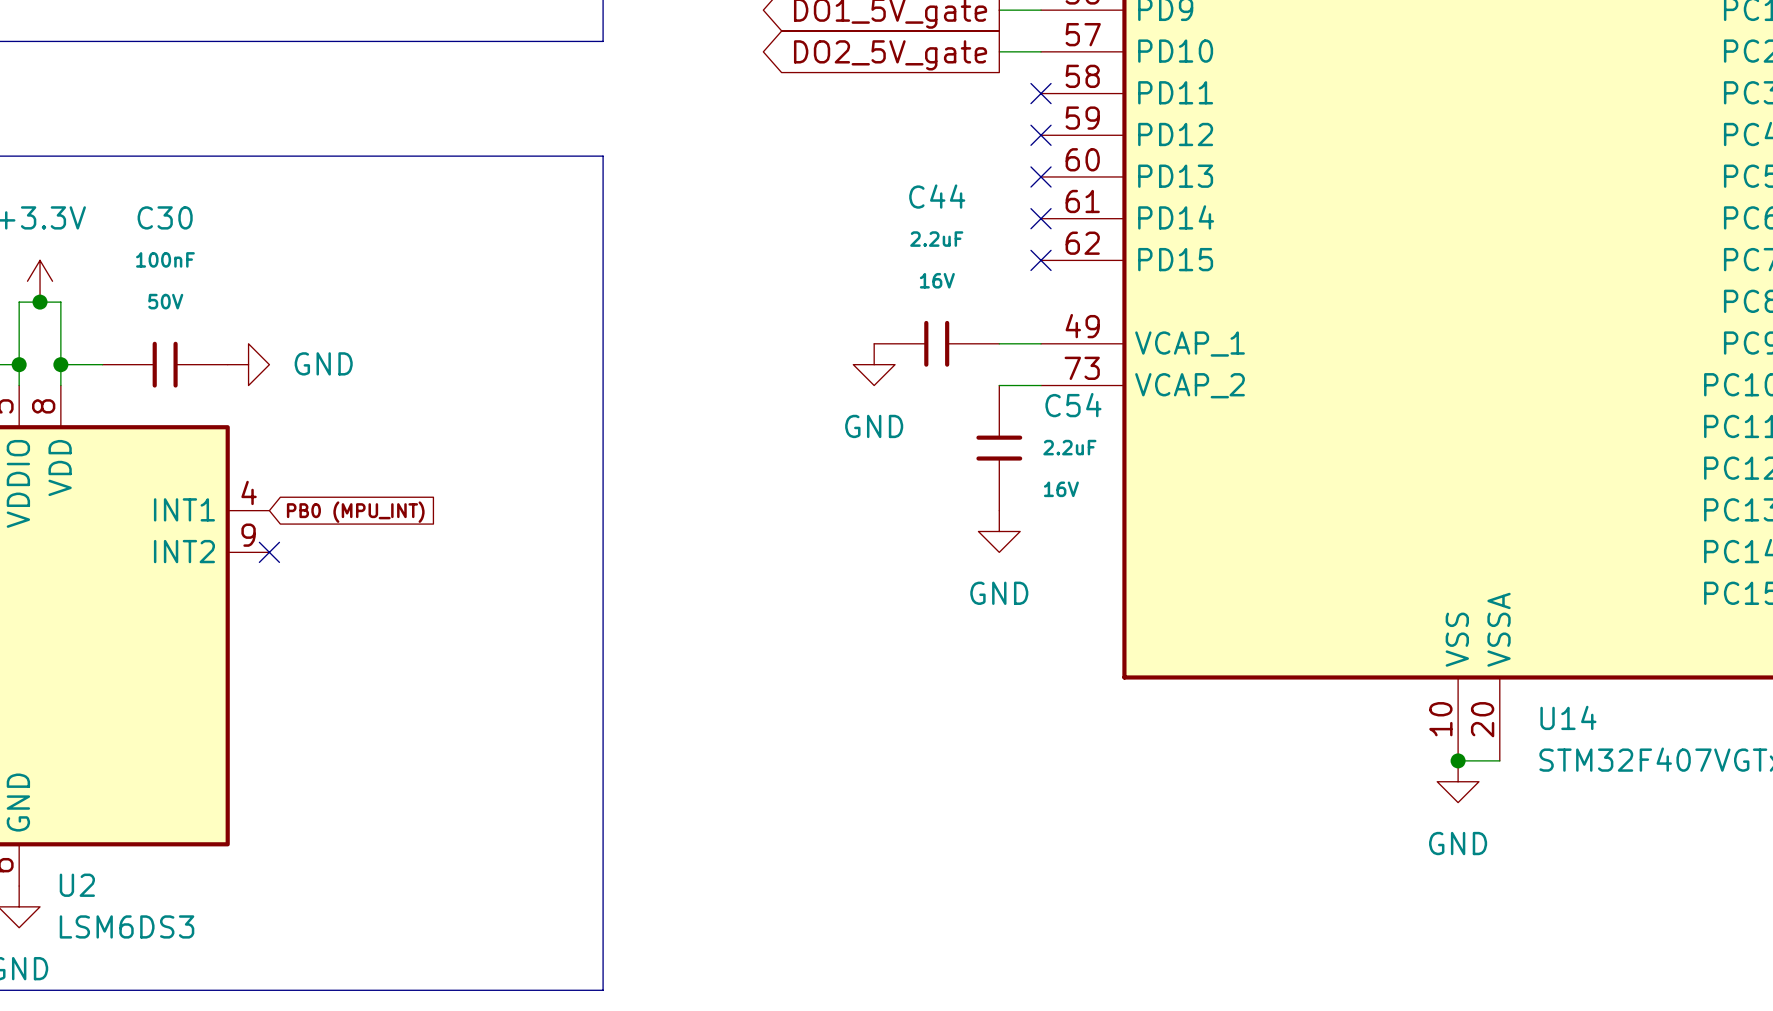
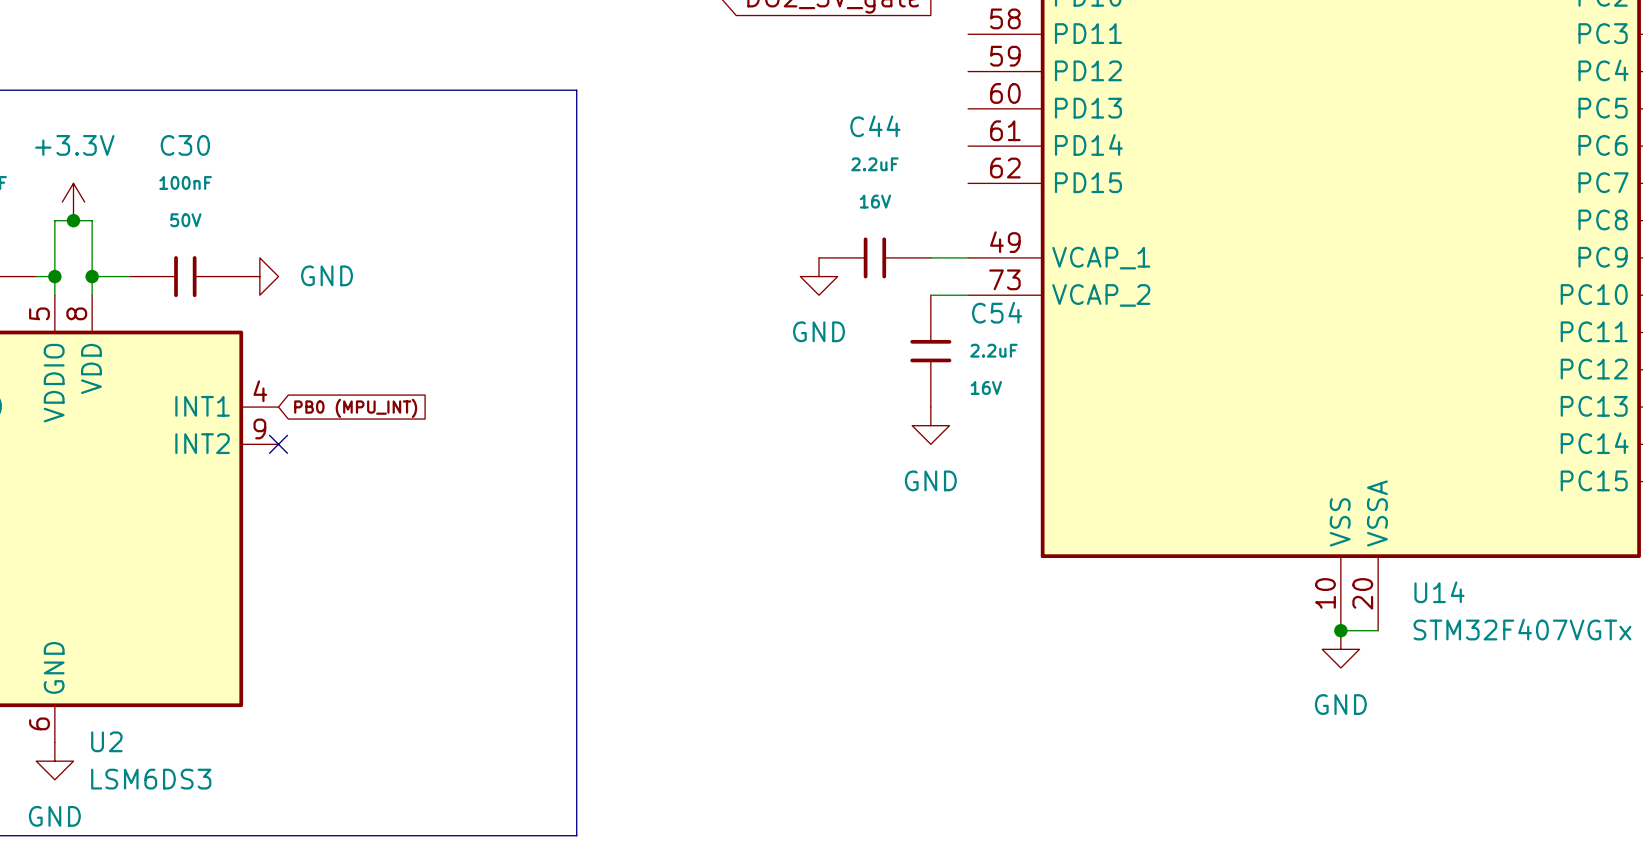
no-connect mark: (1041, 93) -> none
no-connect mark: (1041, 135) -> none
no-connect mark: (1041, 176) -> none
no-connect mark: (1041, 218) -> none
no-connect mark: (1041, 260) -> none

